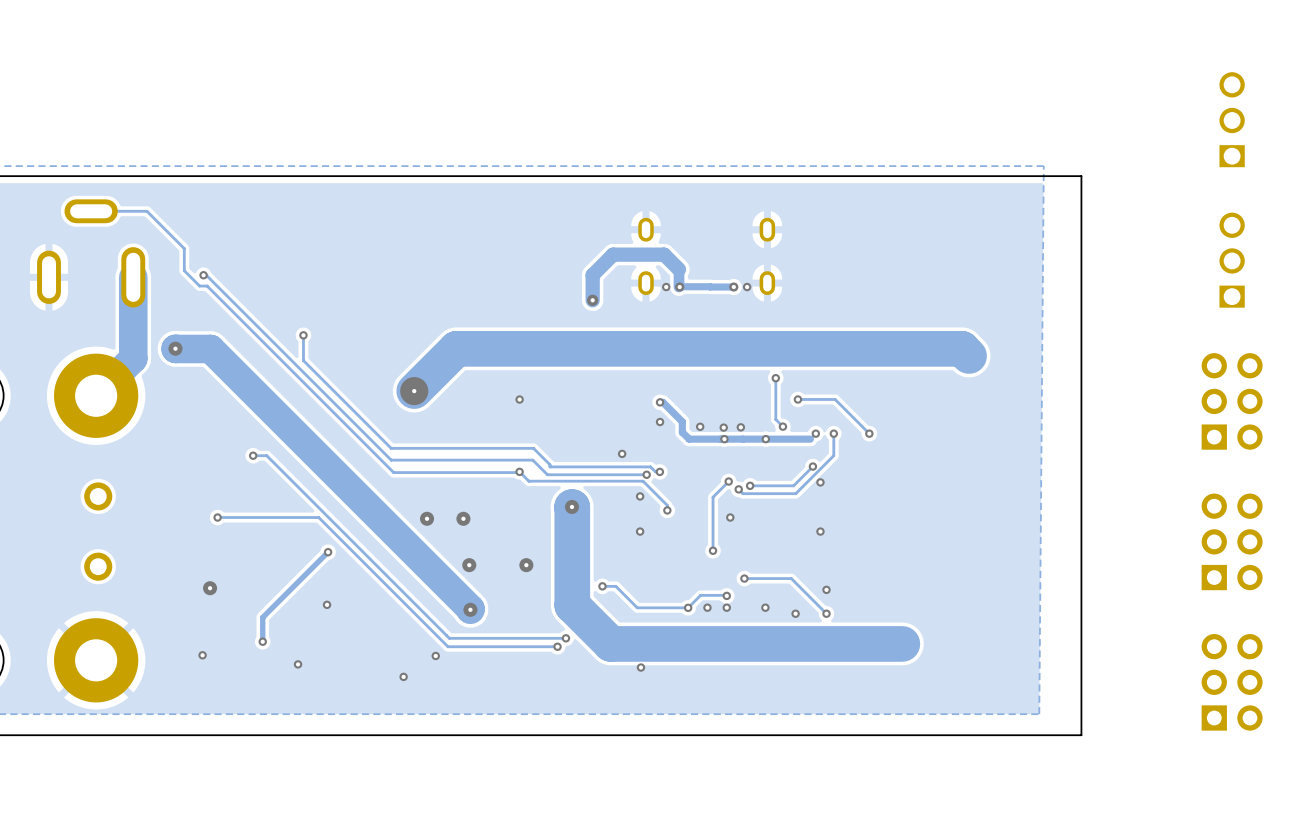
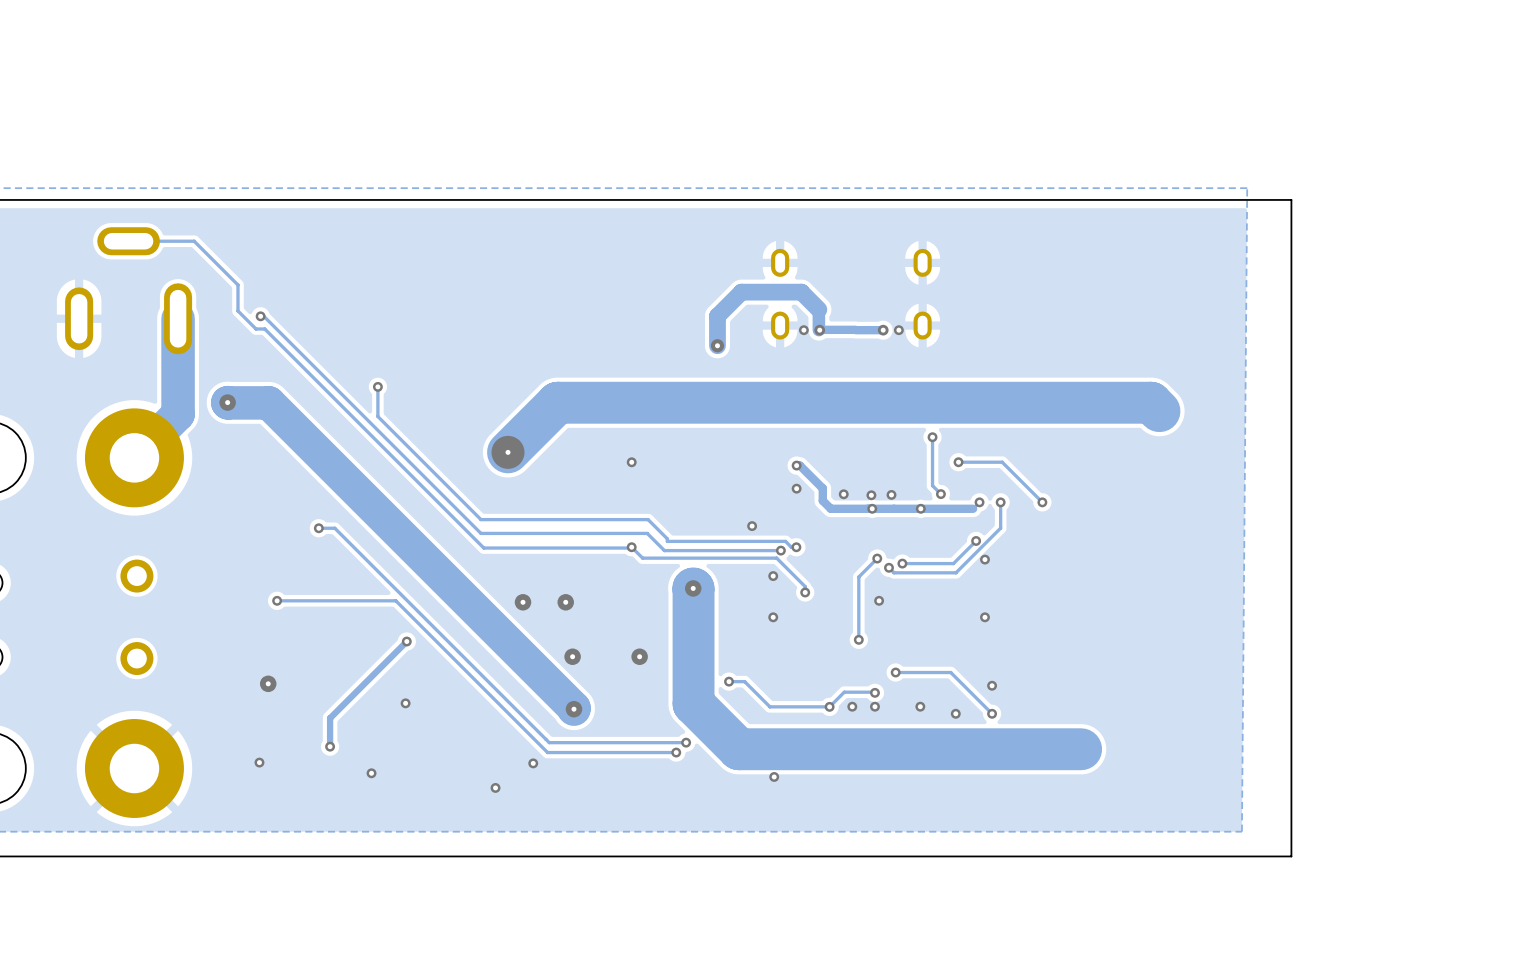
part: (1232, 119) -> none
part: (1232, 260) -> none
part: (1232, 401) -> none
part: (1232, 541) -> none
part: (1232, 682) -> none

